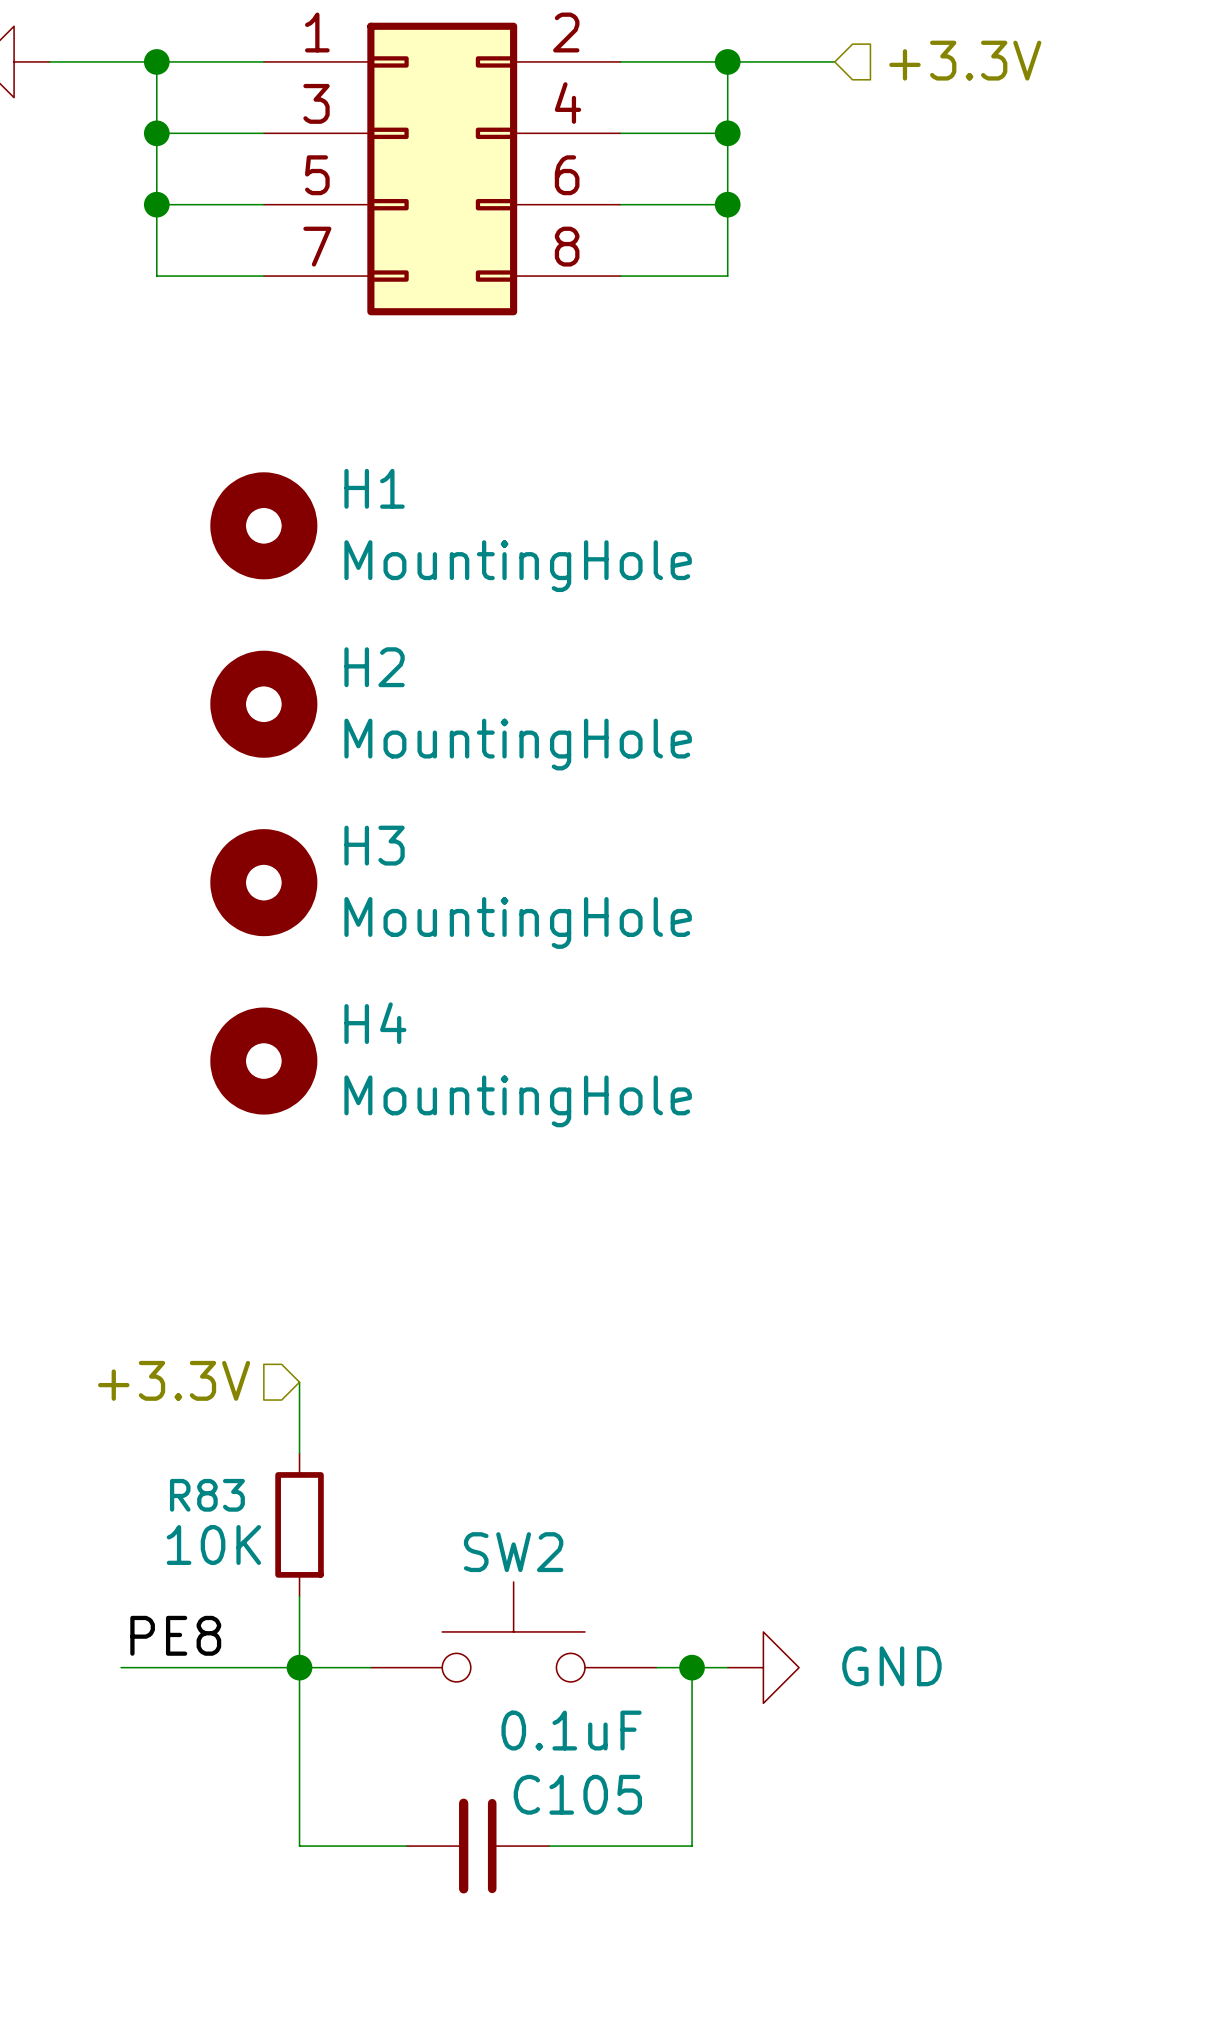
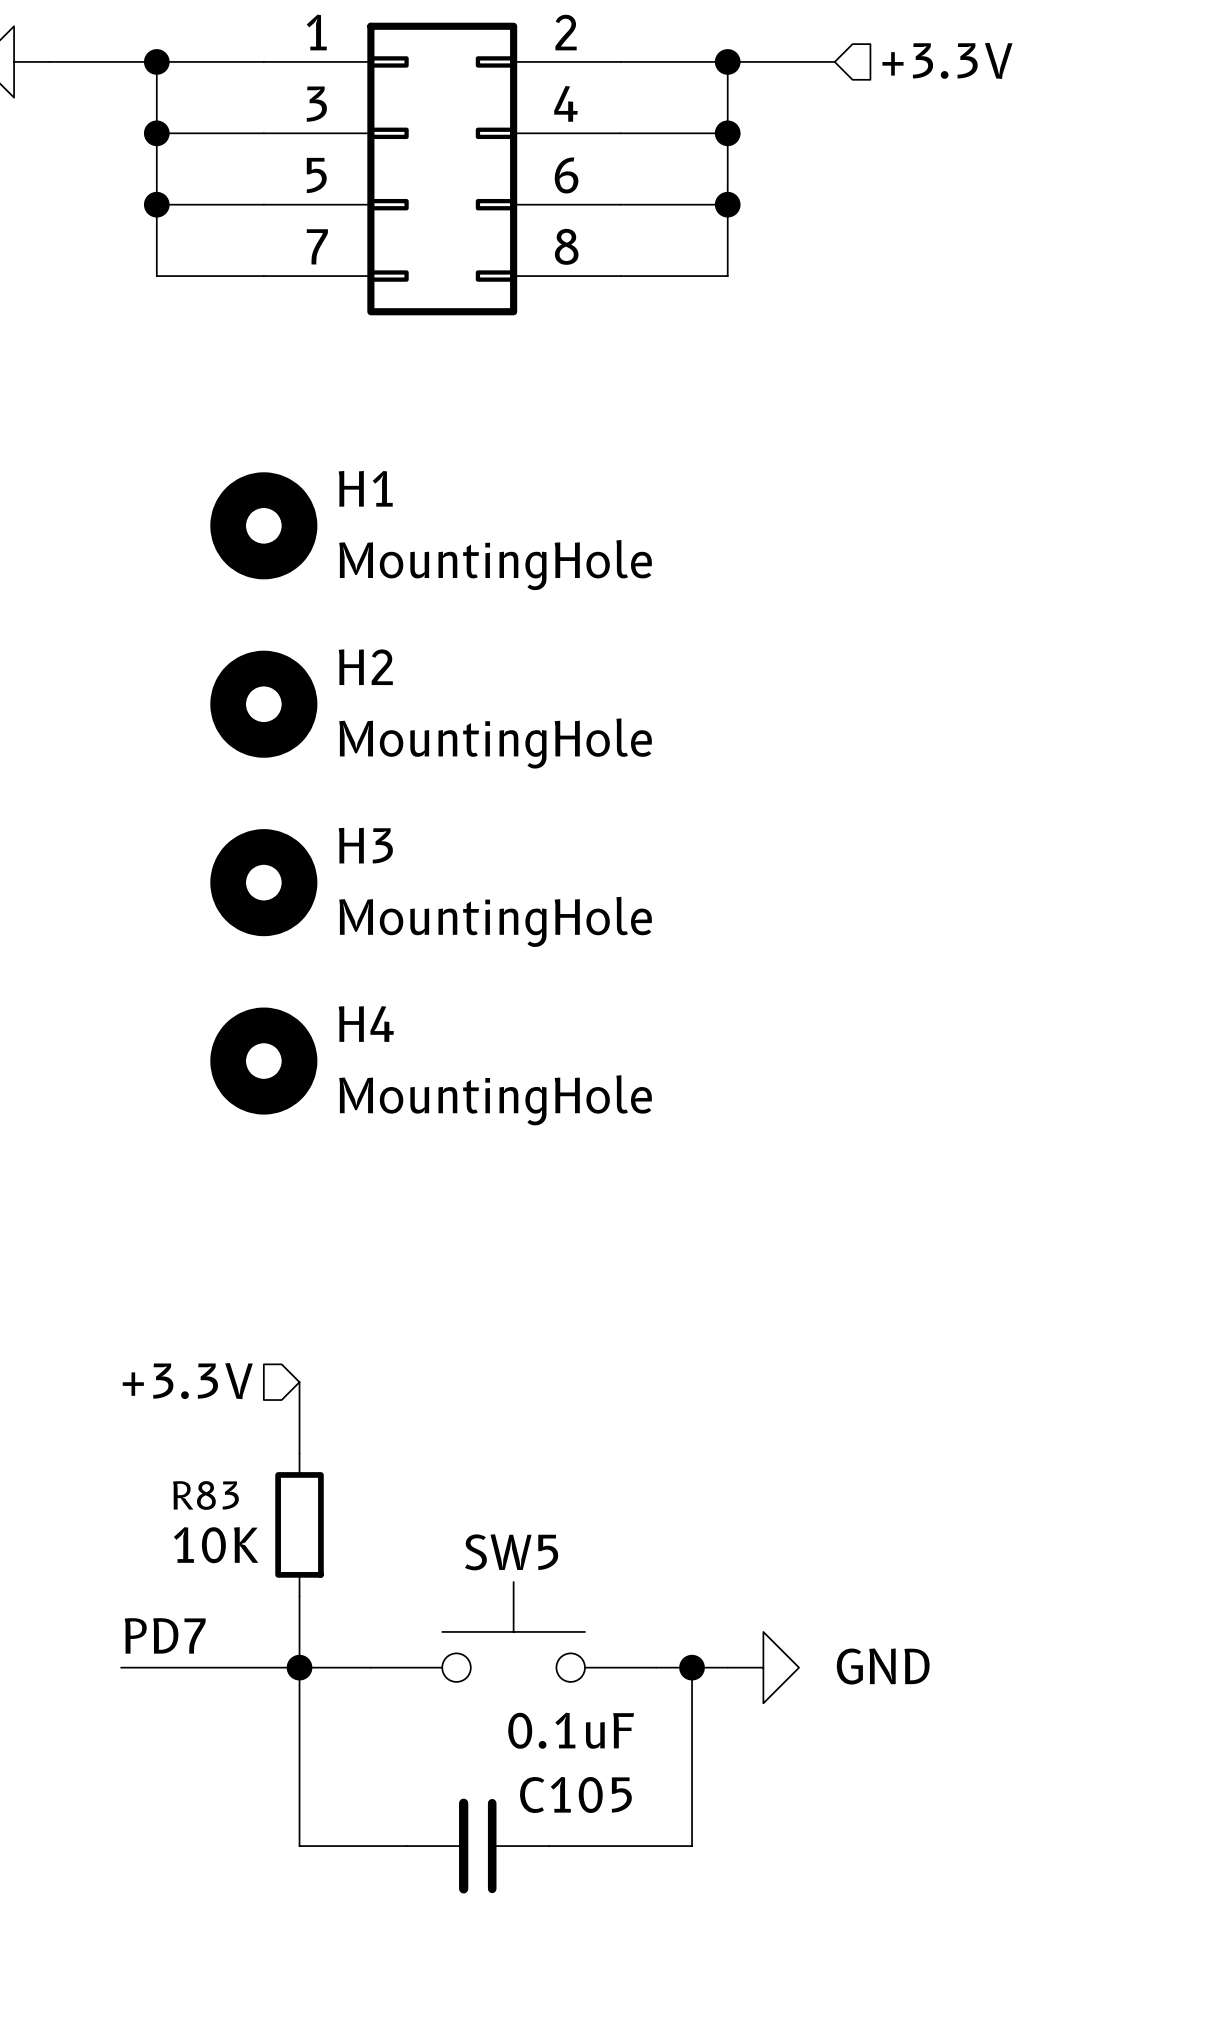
SW2 name: SW2 (513, 1552) -> SW5 (511, 1552)
label: PE8 (175, 1635) -> PD7 (165, 1635)

